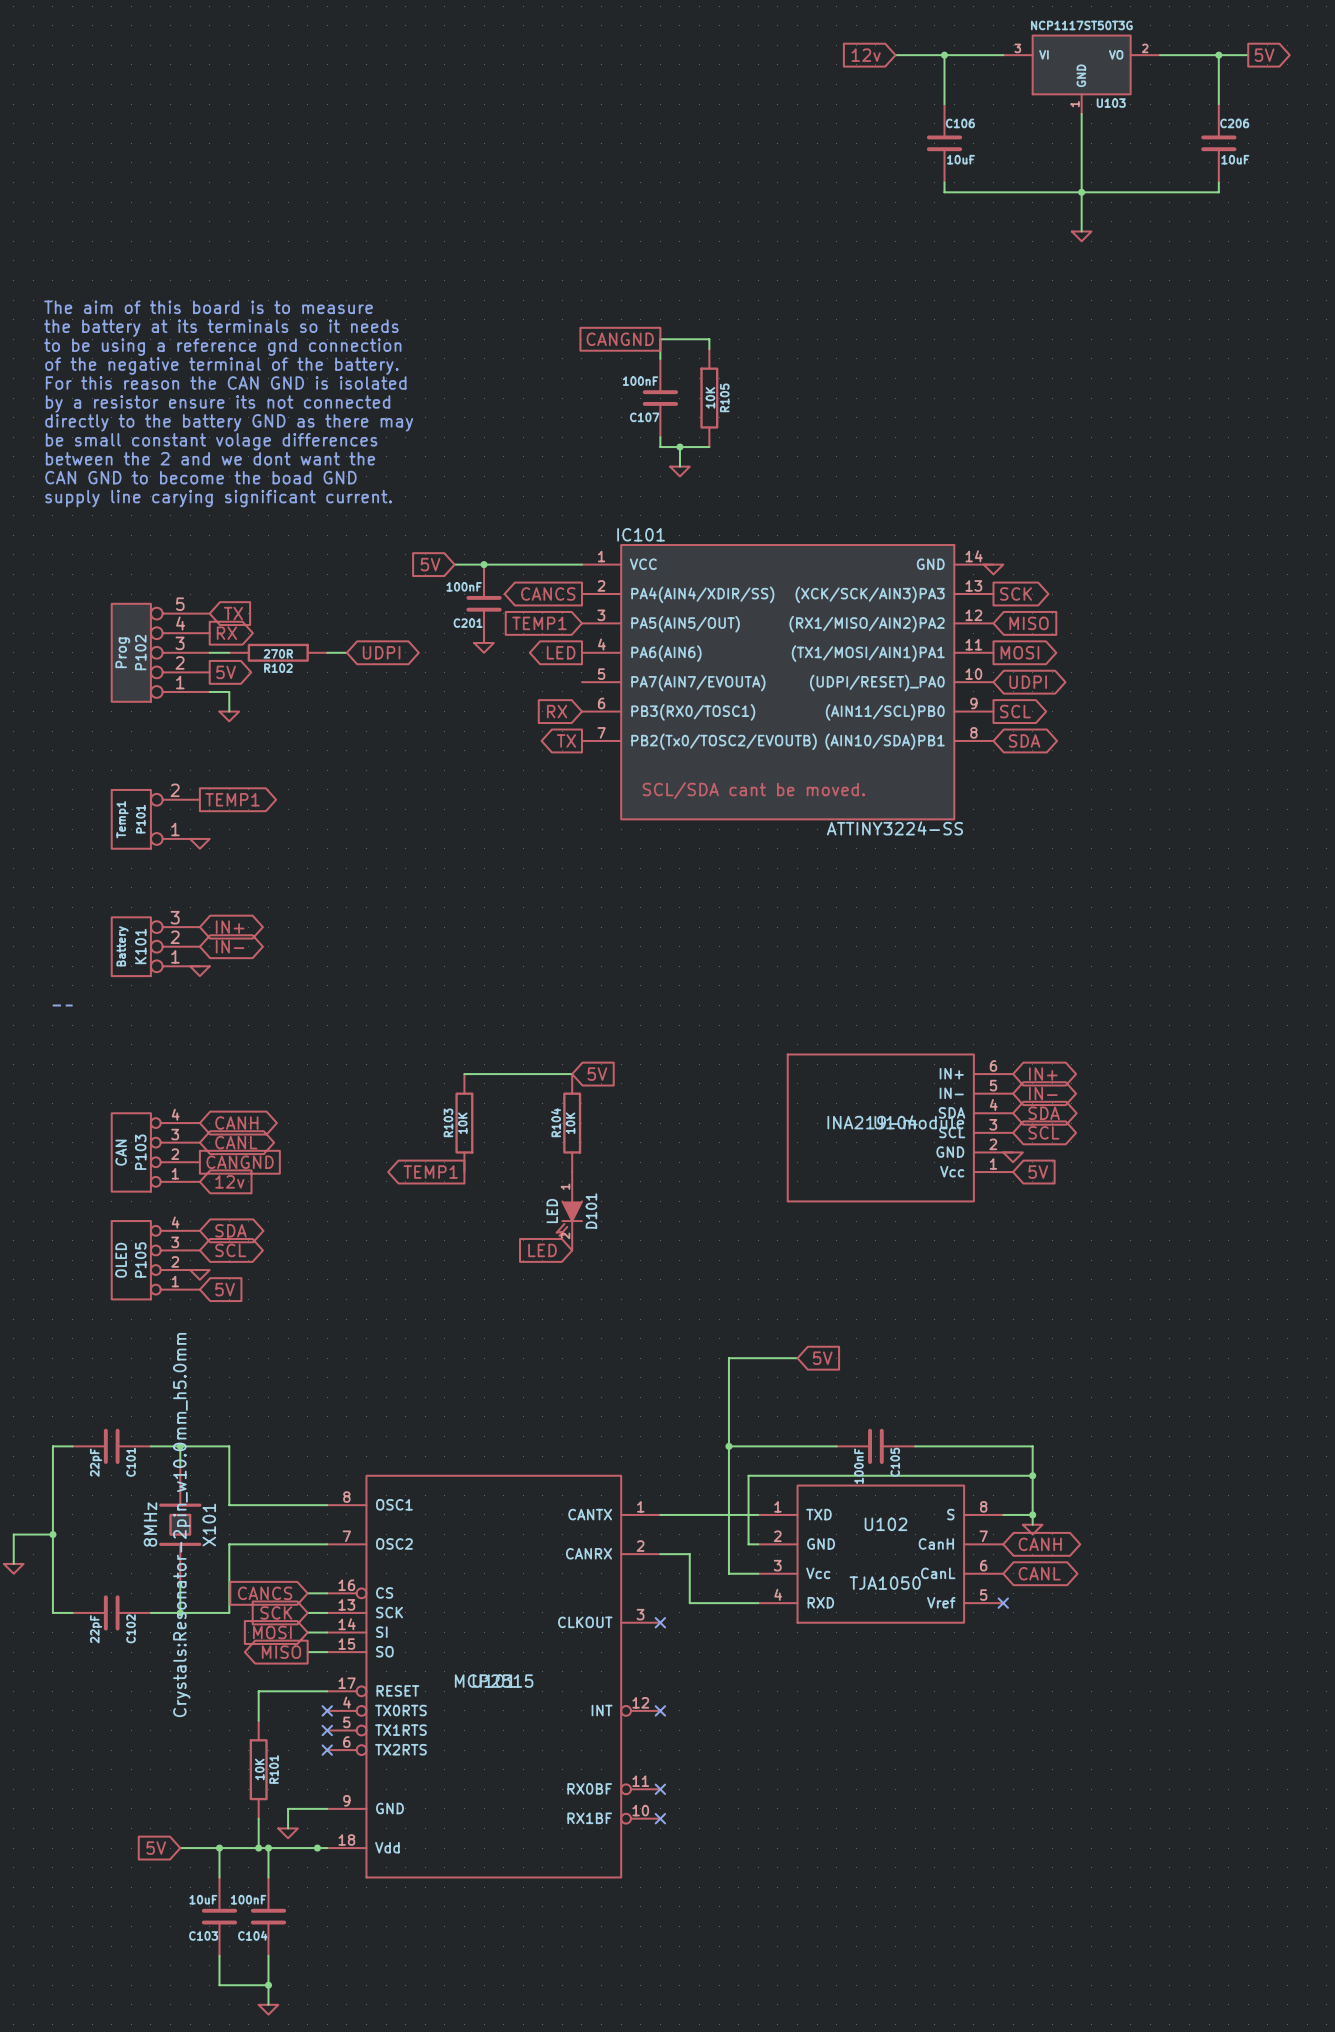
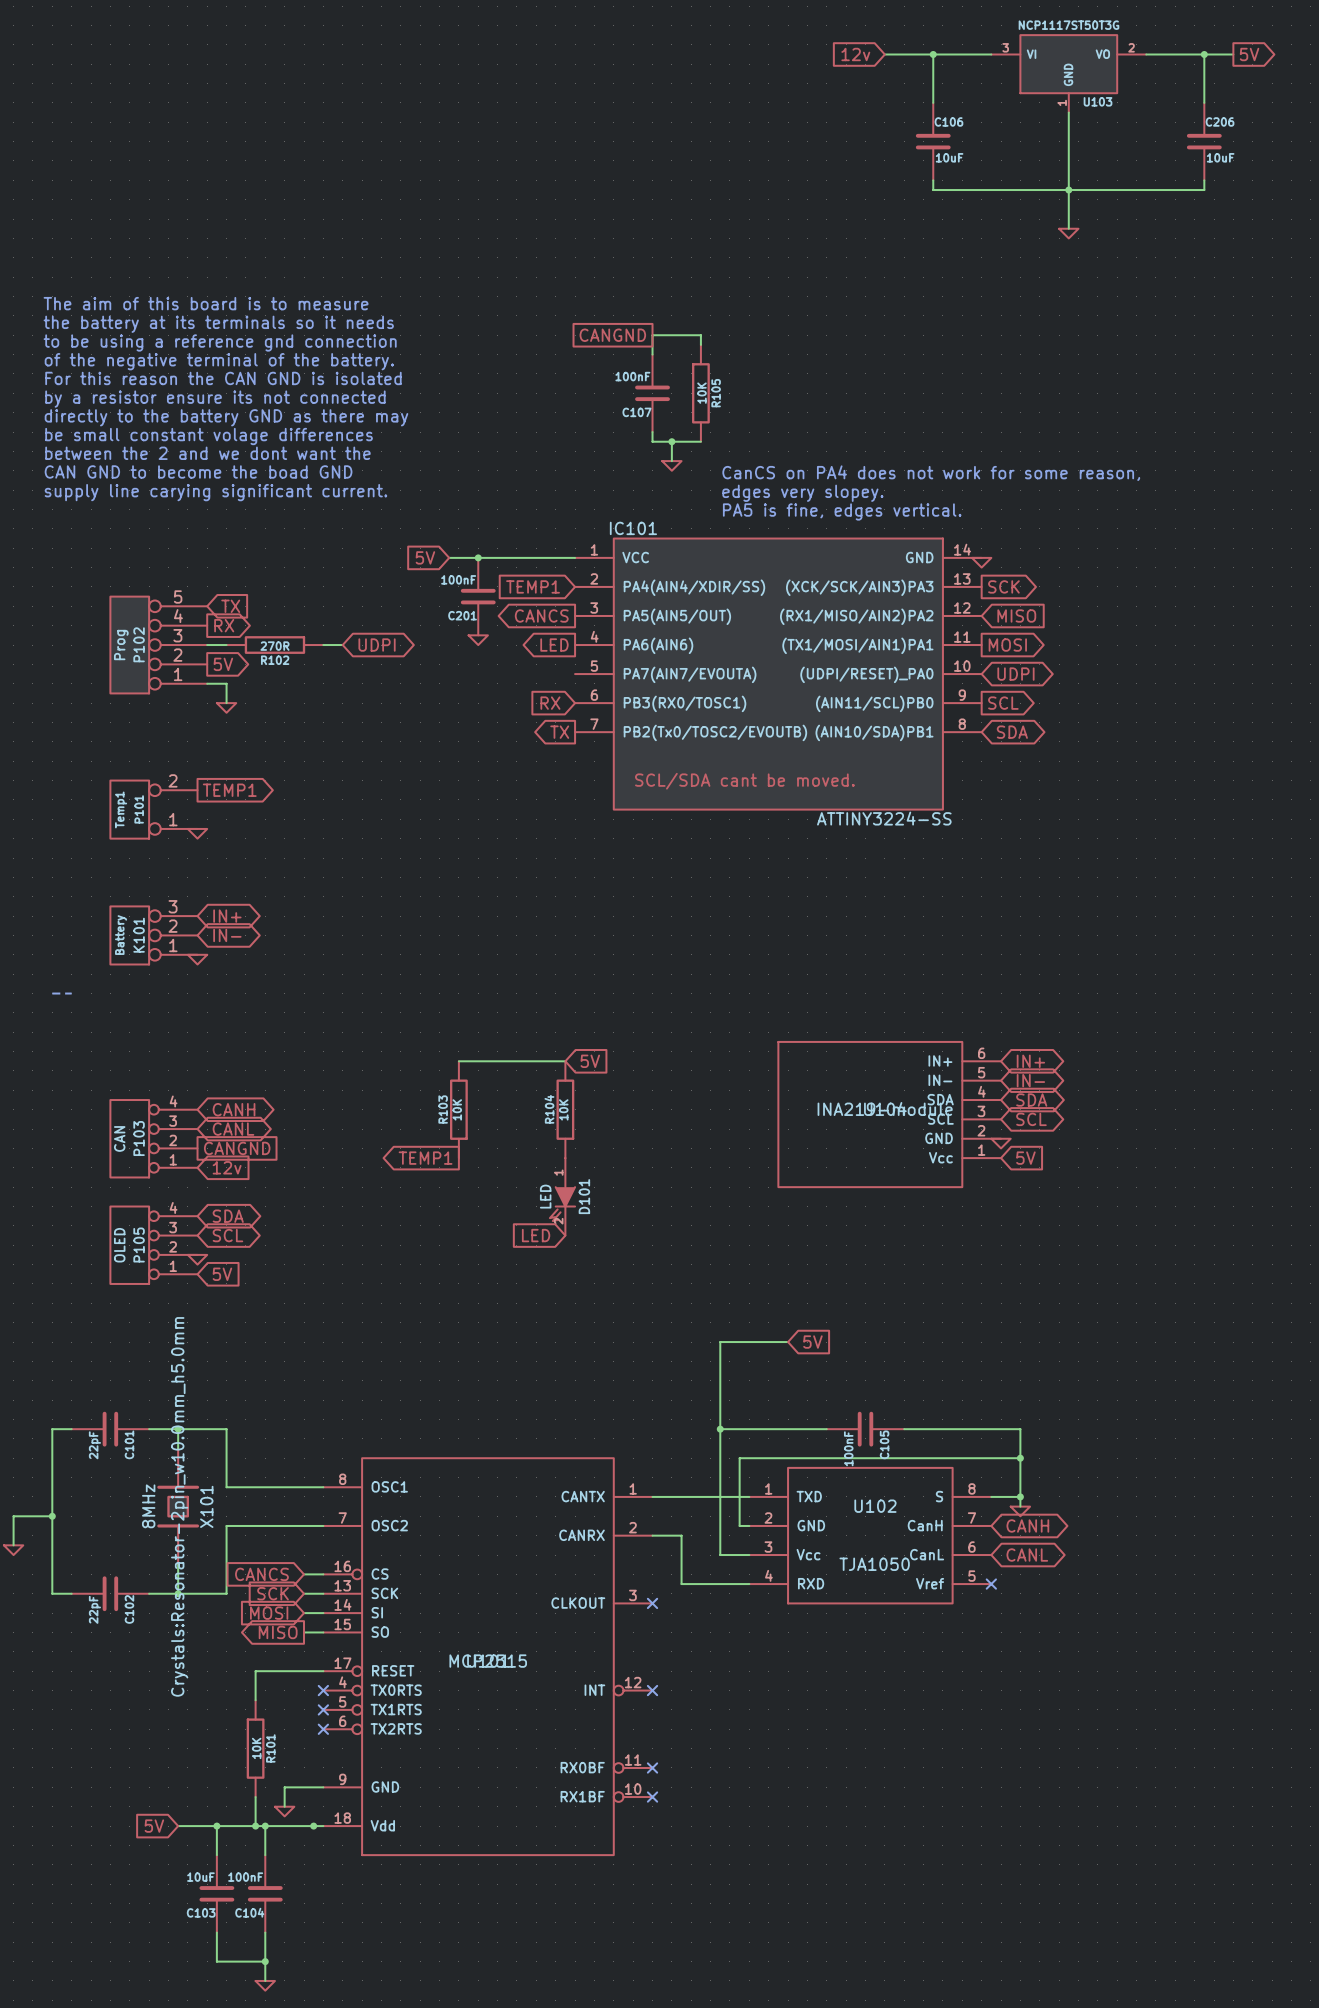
text: none -> CanCS on PA4 does not work for some reason, (931, 473)
text: none -> edges very slopey. (802, 493)
text: none -> PA5 is fine, edges vertical. (842, 511)
global label shape: output (548, 594) -> input (533, 586)
global label: CANCS (548, 594) -> TEMP1 (533, 586)
global label shape: input (539, 623) -> output (541, 615)
global label: TEMP1 (539, 623) -> CANCS (541, 615)

